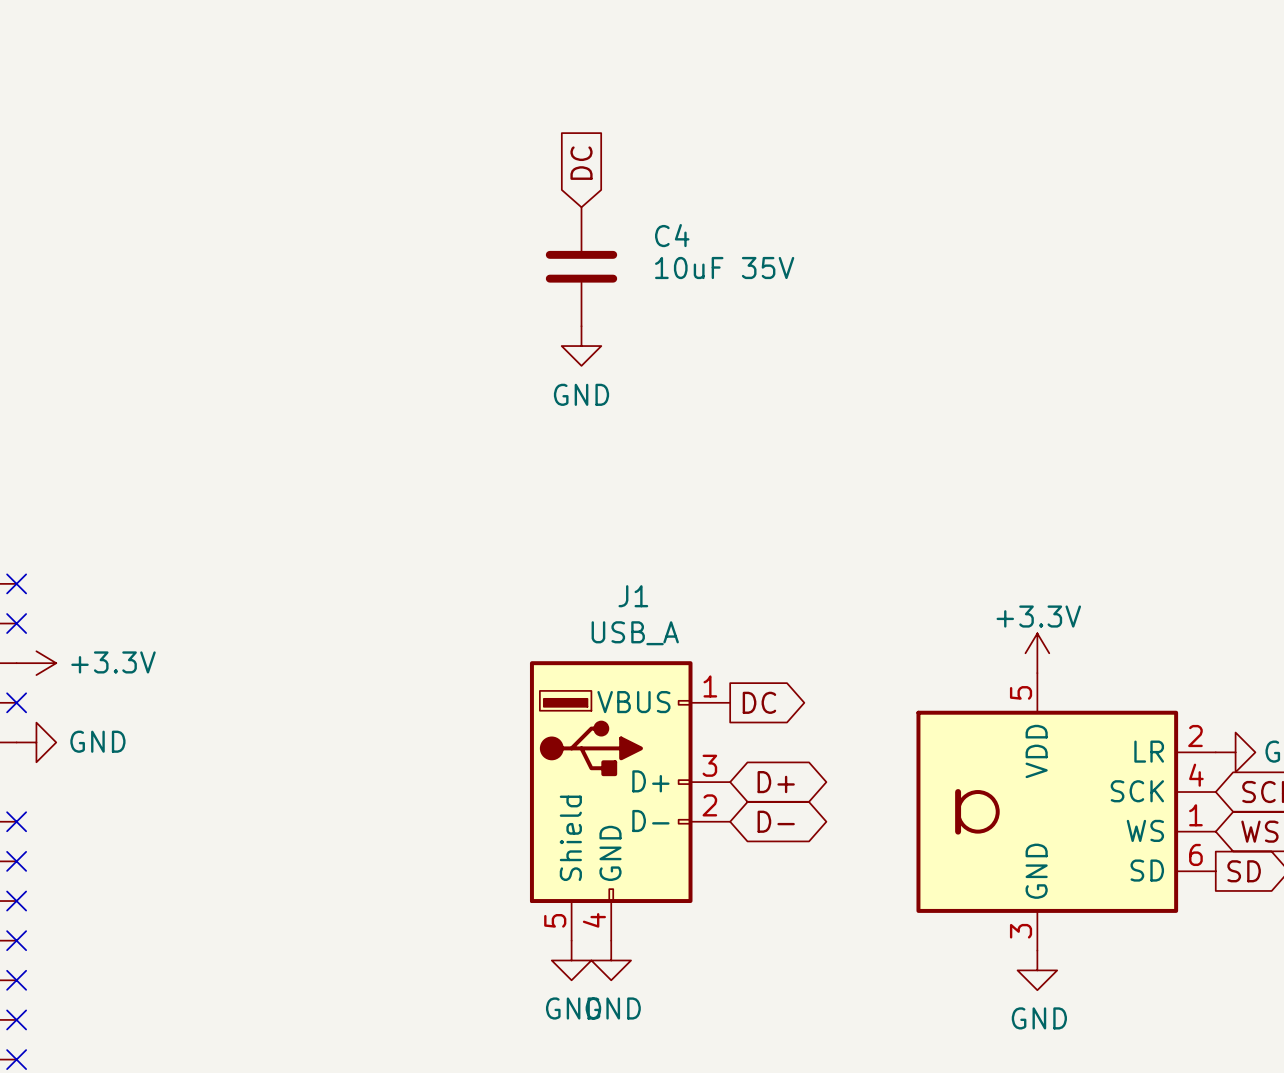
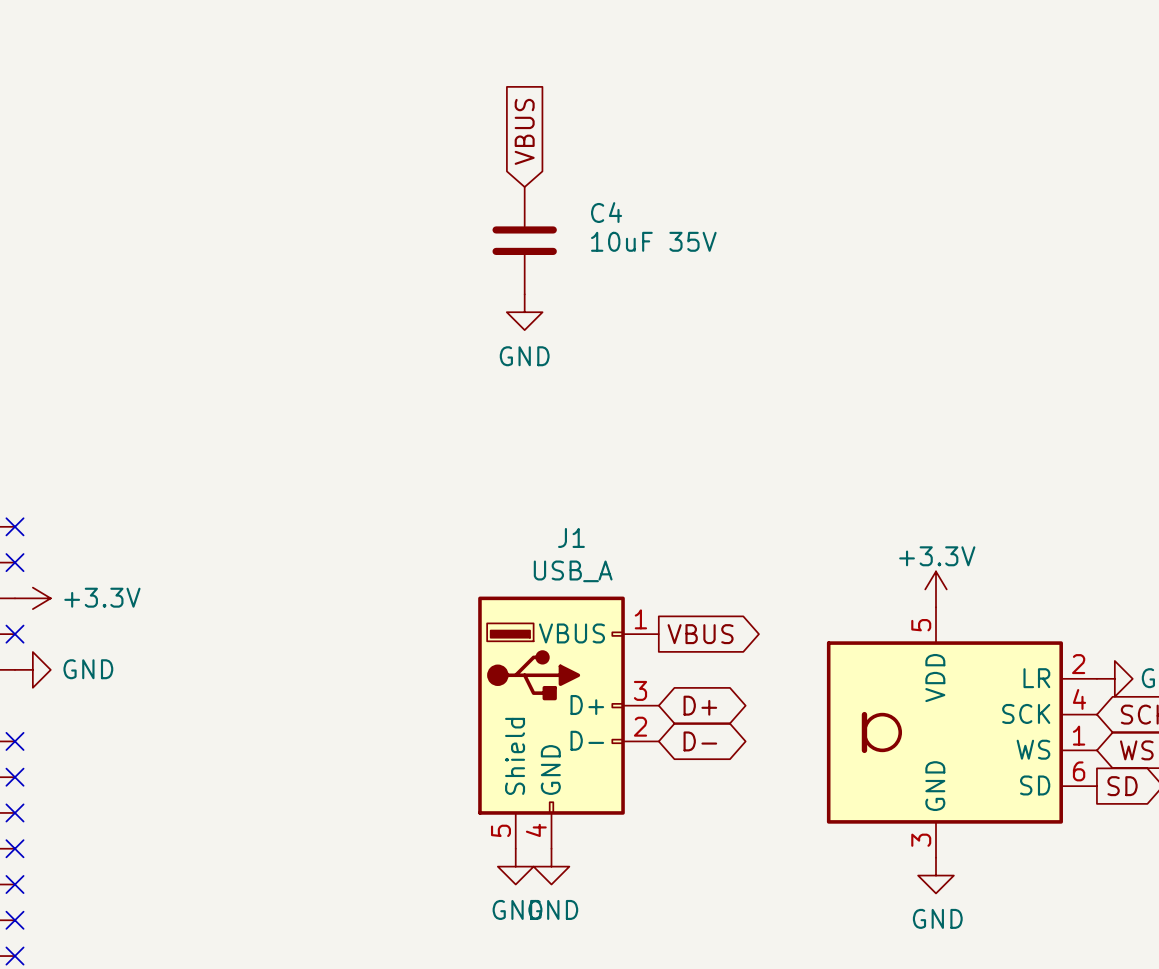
global label: DC (581, 163) -> VBUS (524, 131)
global label: DC (759, 702) -> VBUS (700, 634)

